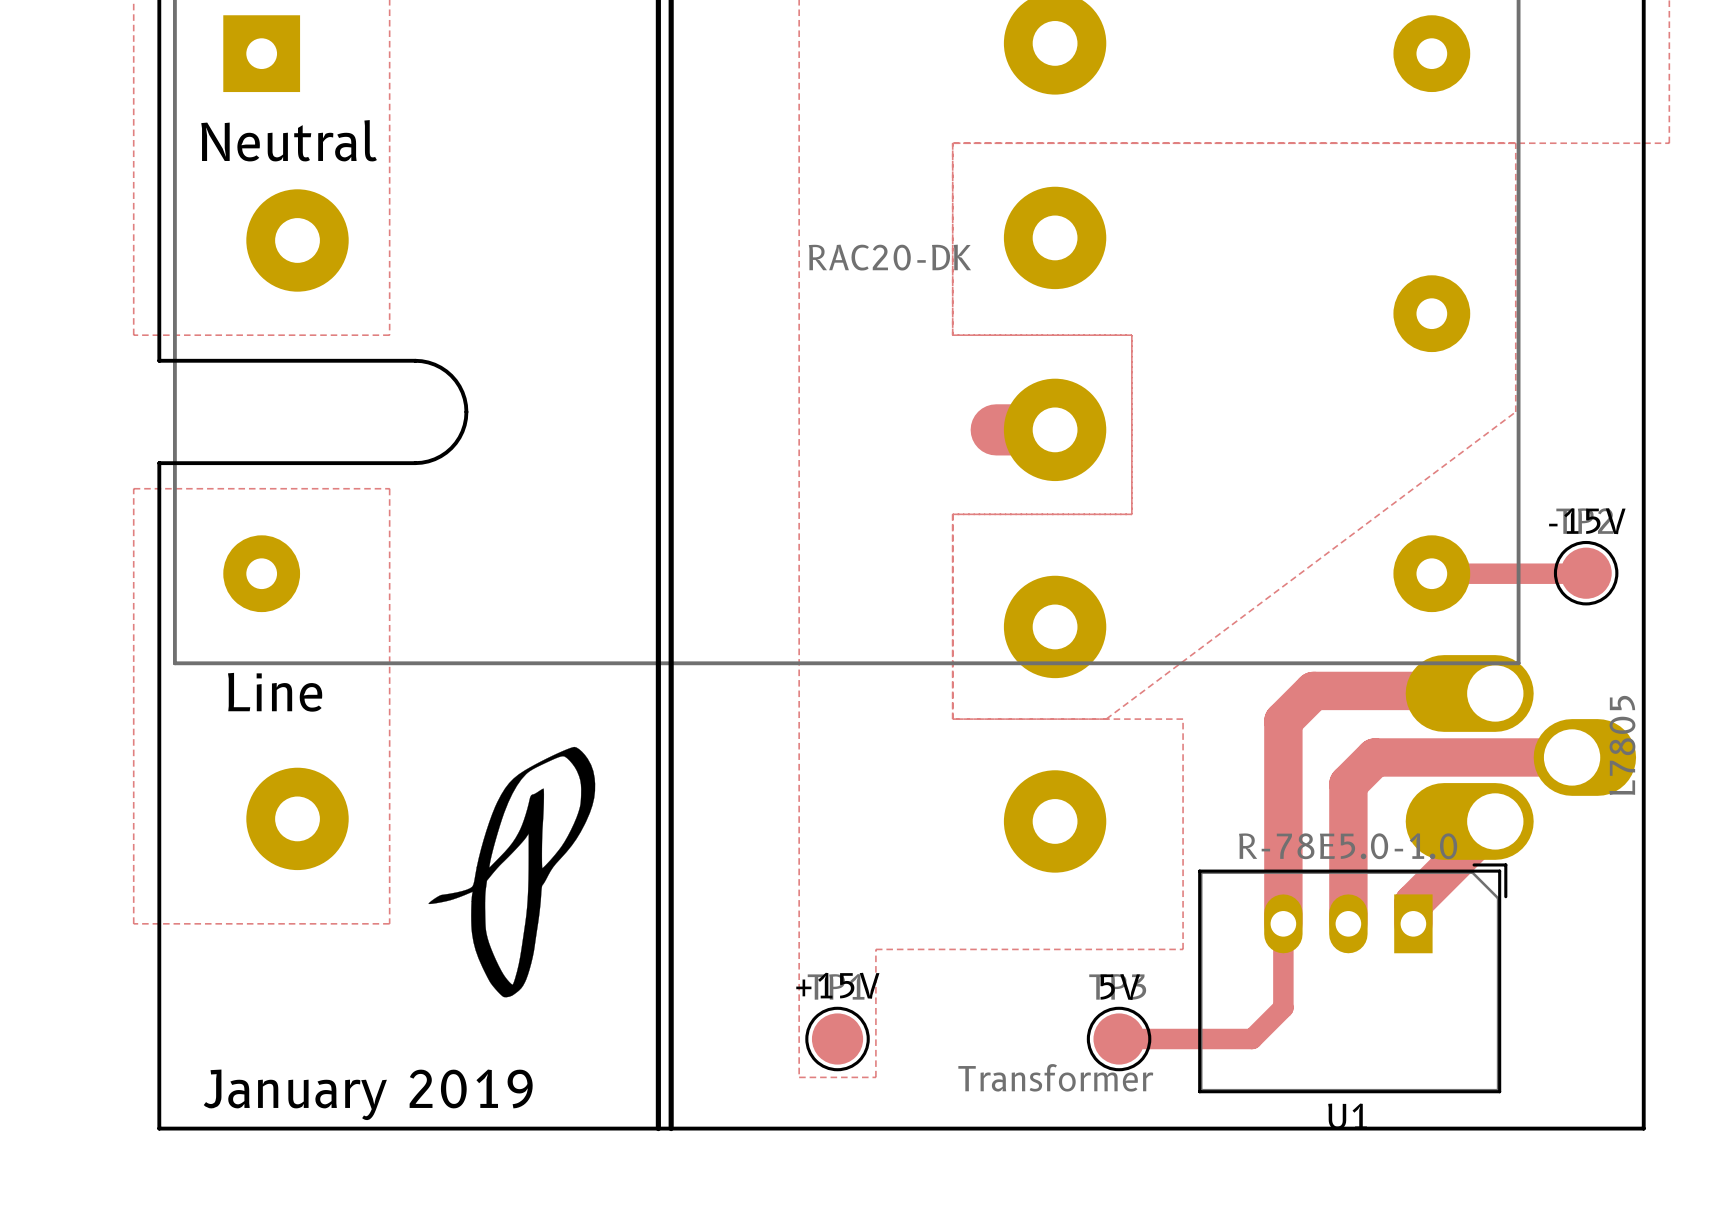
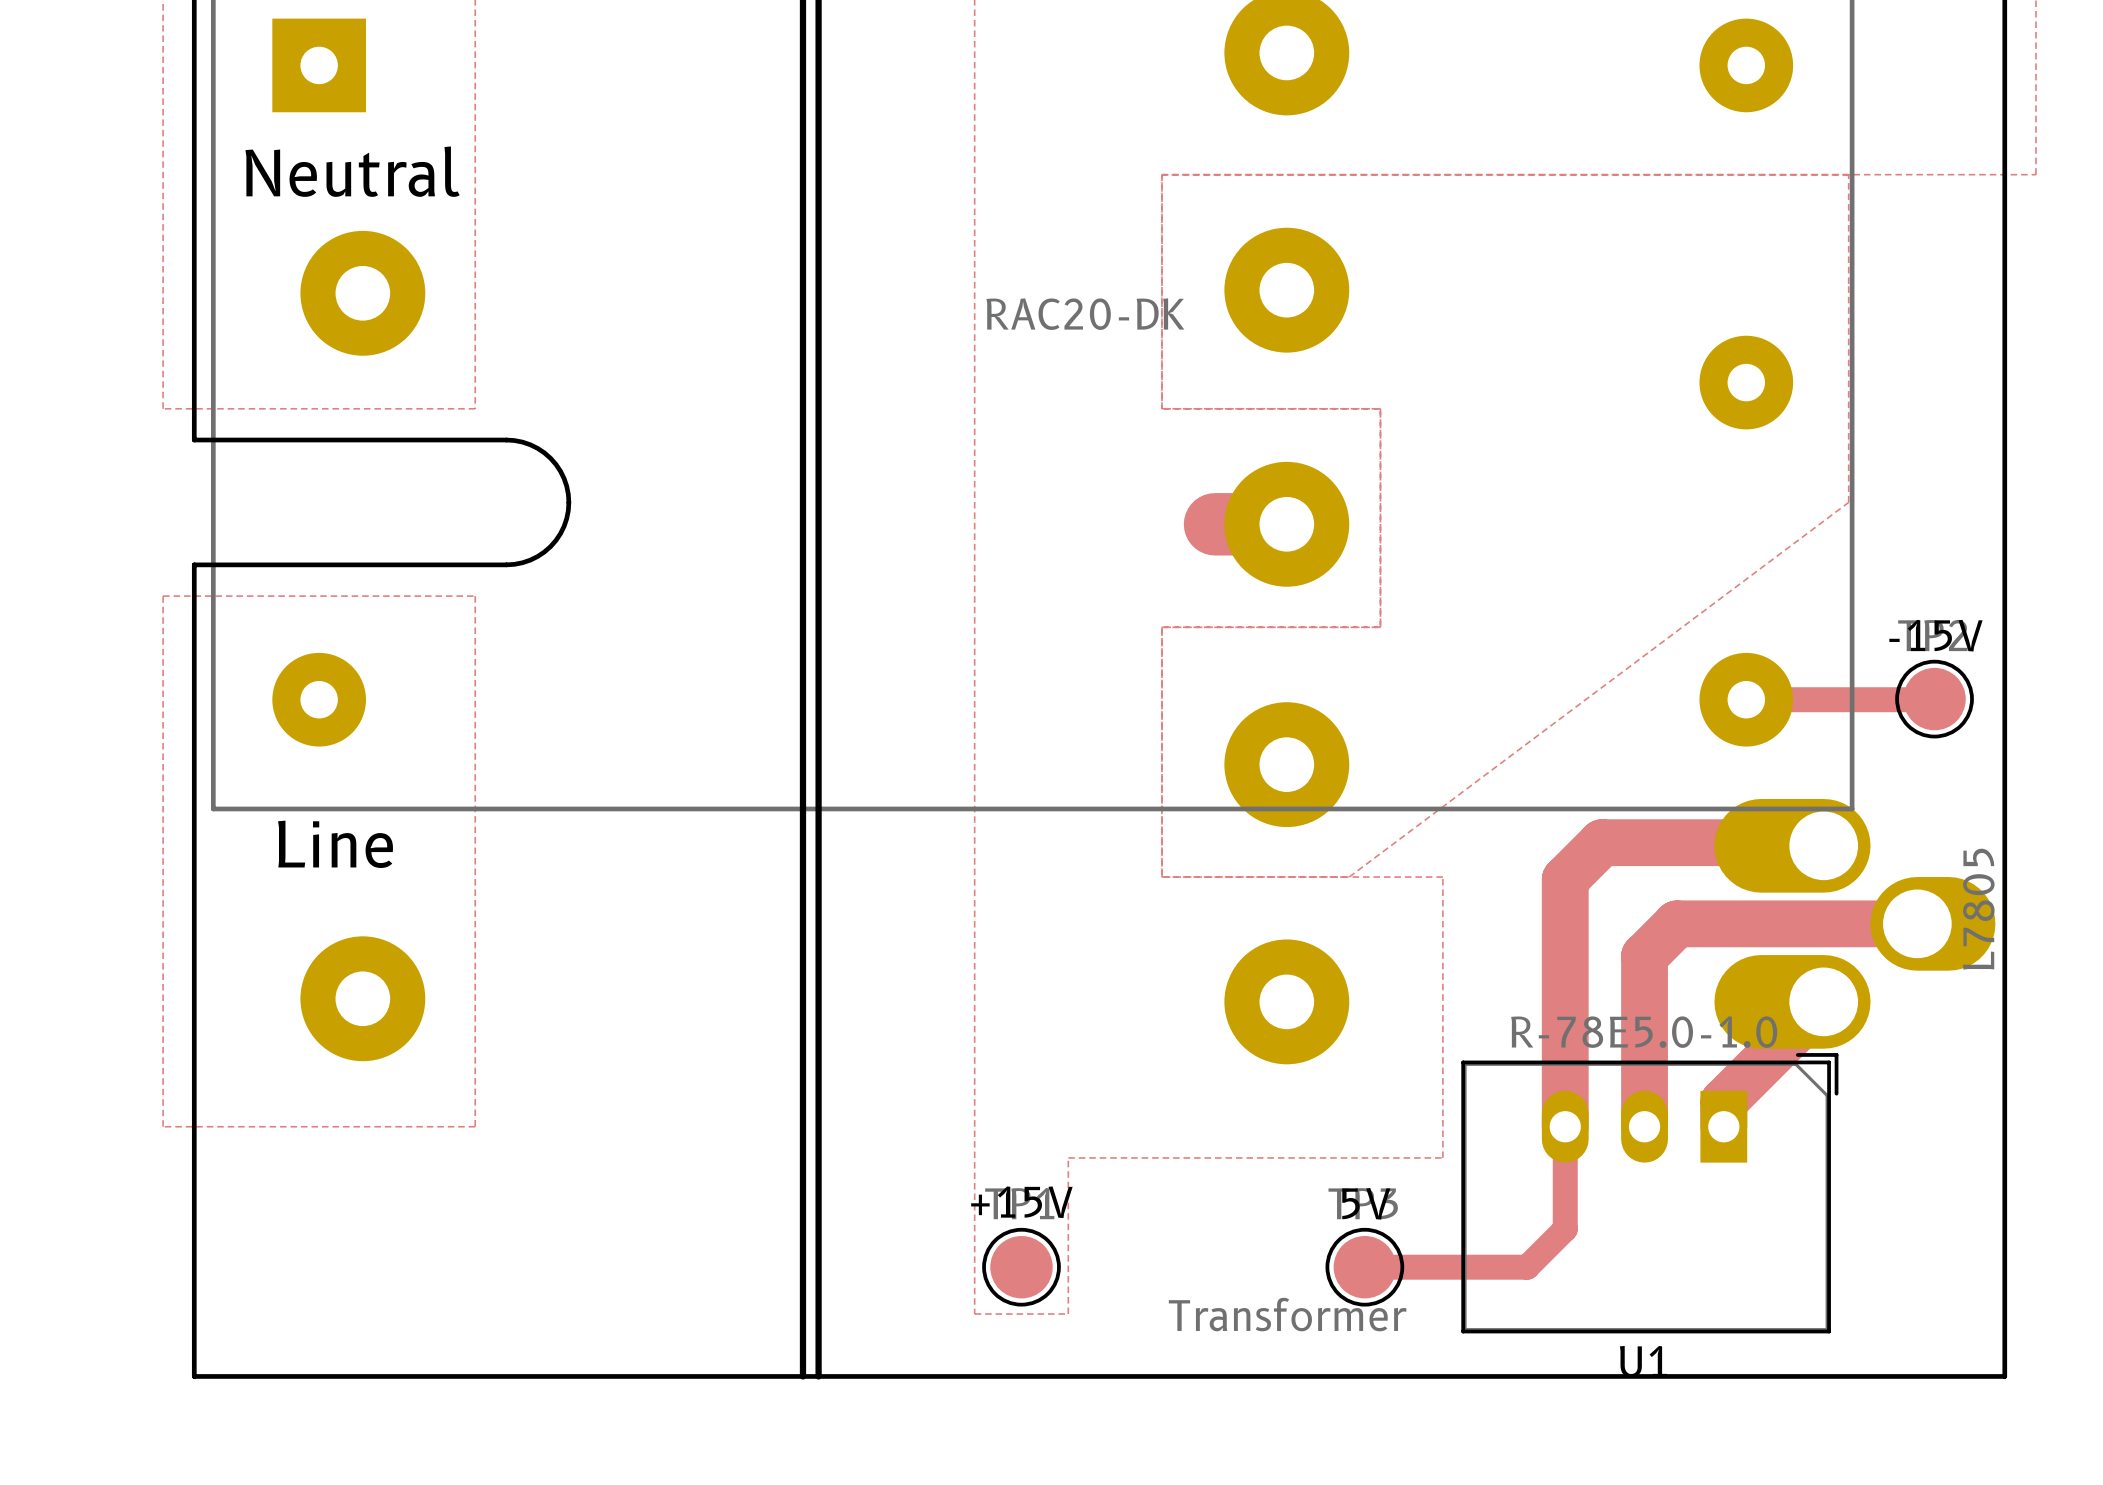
drawing: [428, 746, 596, 998] -> none
text: January 2019 (368, 1094) -> none

